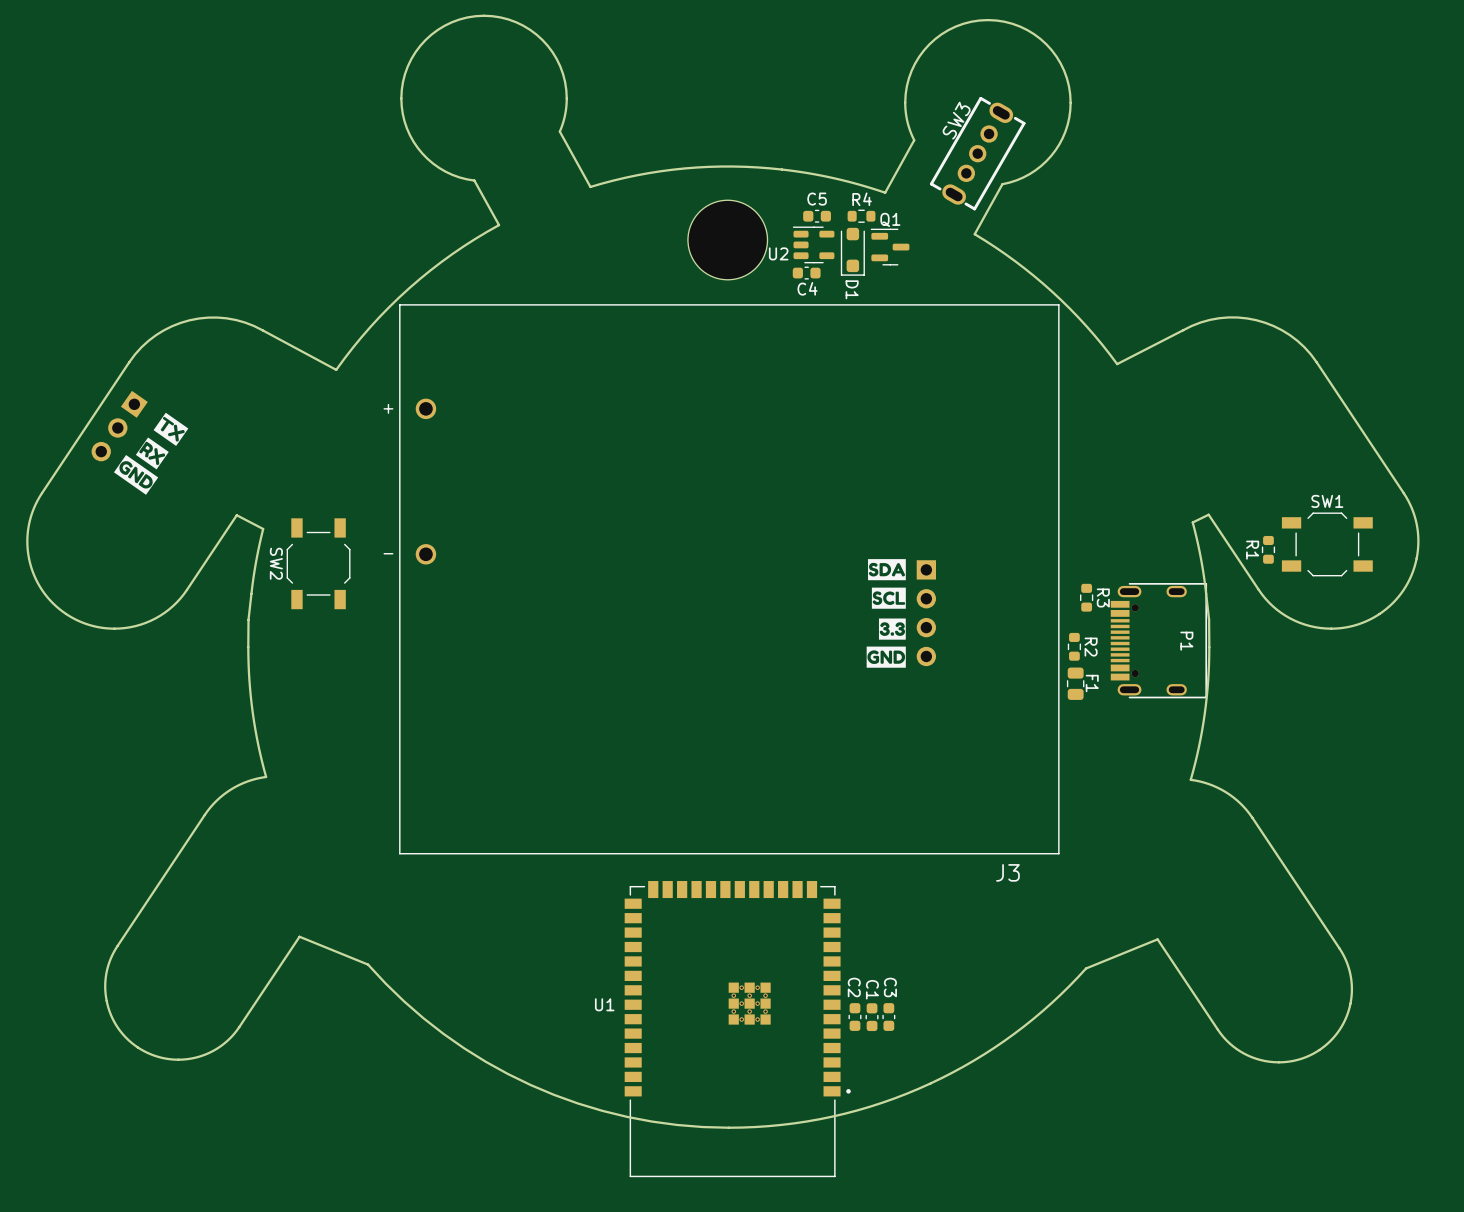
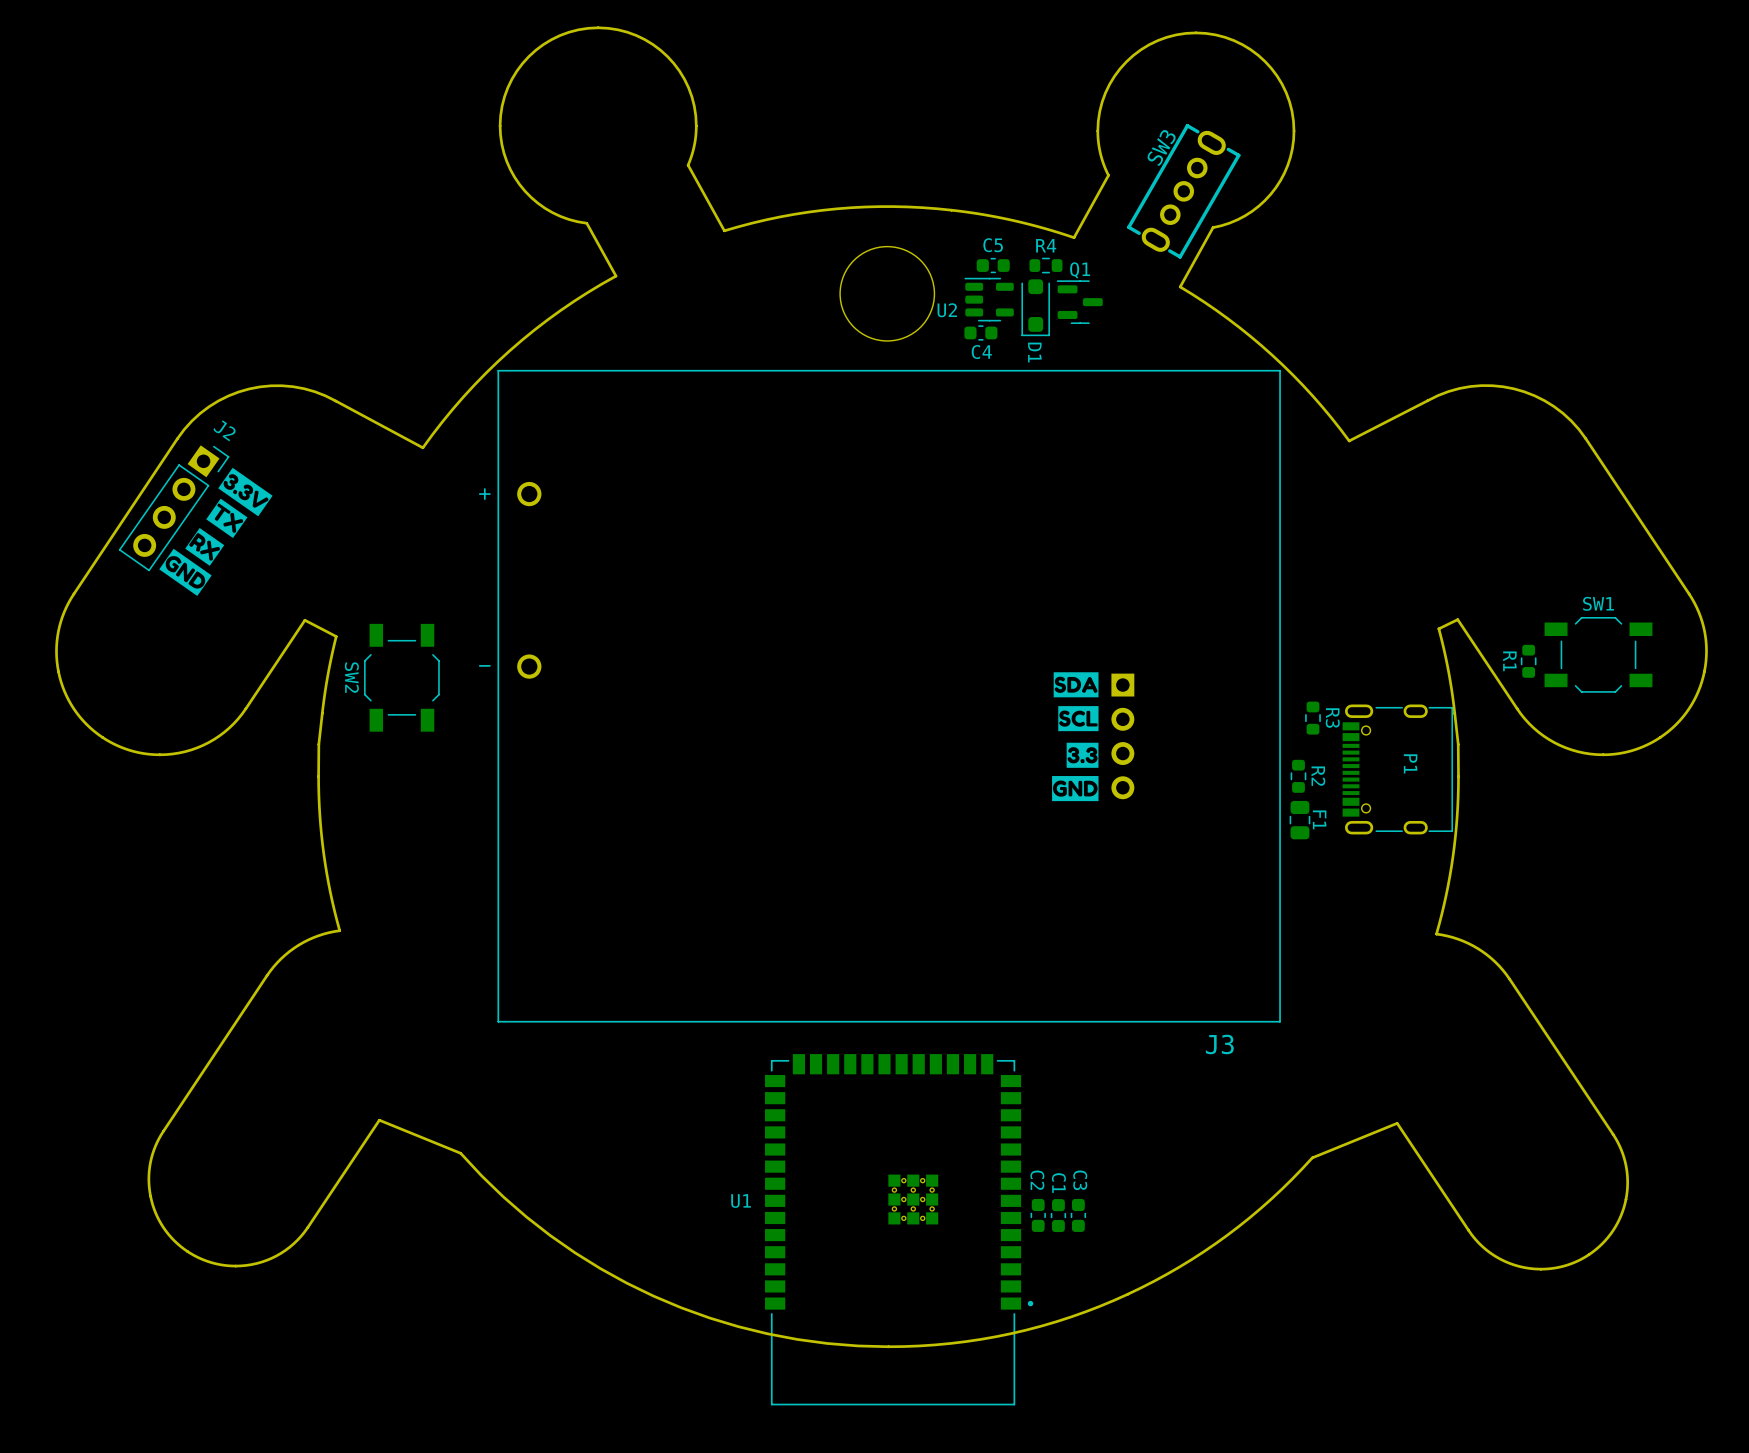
drawing: none -> [218, 467, 273, 517]
J2: none -> (174, 508)
part: (119, 426) -> none
P1 footprint: [1110, 583, 1208, 699] -> [1342, 704, 1454, 835]

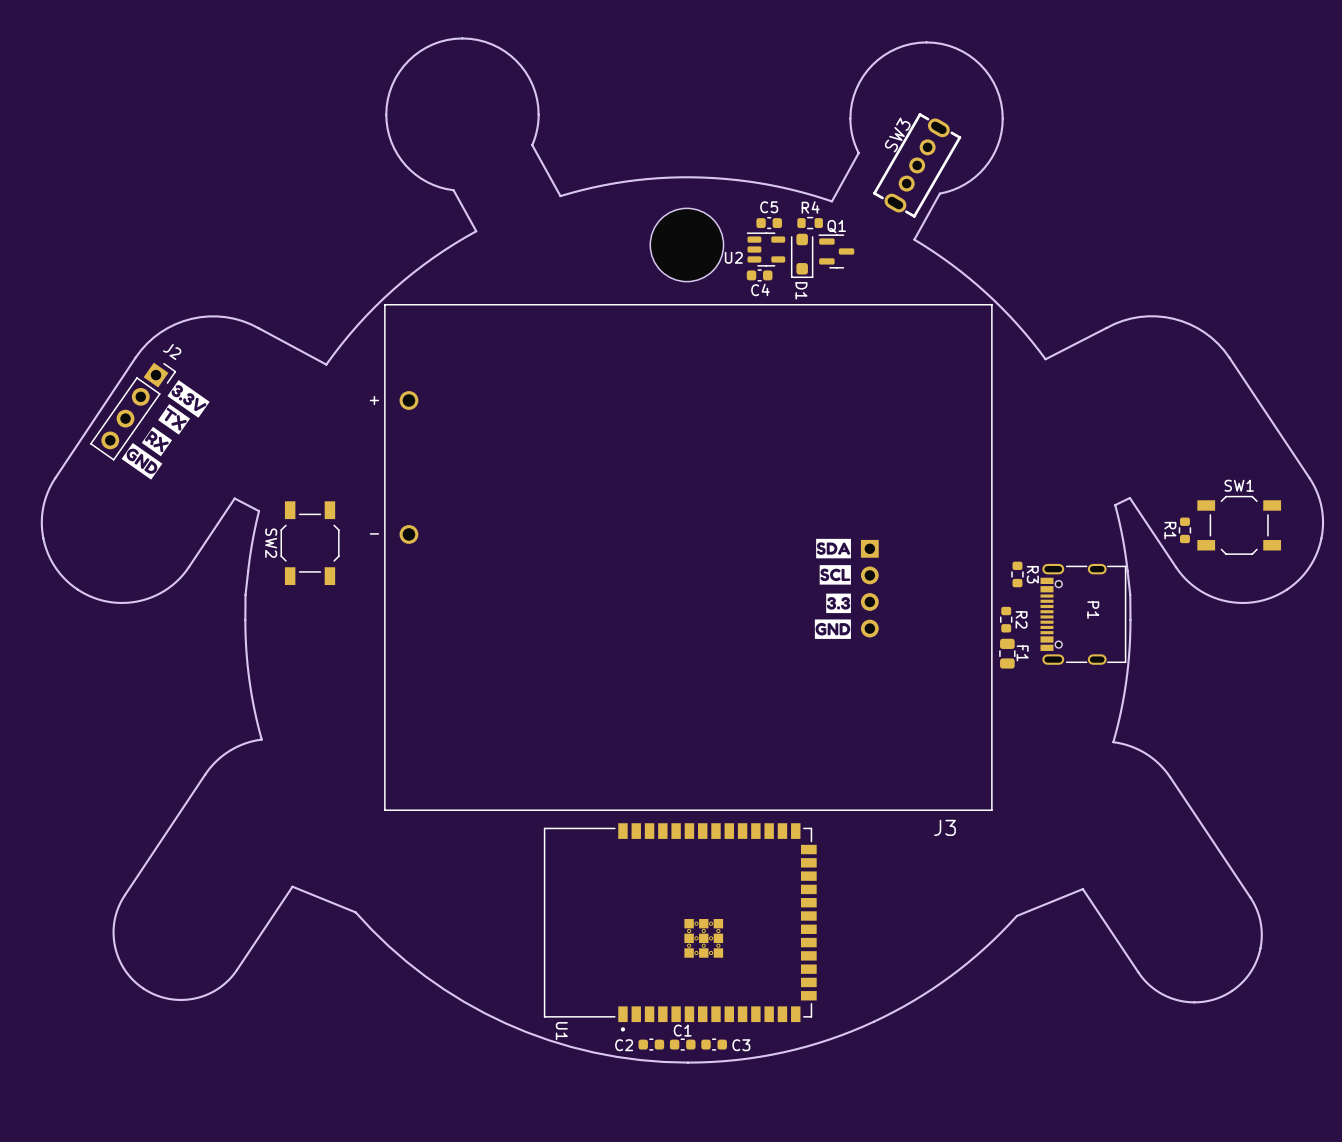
C2 name position: C2 (1037, 1180) -> C2 (624, 1045)
U1 name position: U1 (741, 1201) -> U1 (561, 1031)
C2 rotation: 0° (1038, 1215) -> 90° clockwise (651, 1044)
C2 position: (1038, 1215) -> (651, 1044)
C1 rotation: 0° (1058, 1215) -> 90° clockwise (682, 1044)
C1 position: (1058, 1215) -> (682, 1044)
C3 rotation: 0° (1078, 1215) -> 90° clockwise (714, 1044)
C3 position: (1078, 1215) -> (714, 1044)
U1 rotation: 0° (899, 1229) -> 90° clockwise (680, 927)

